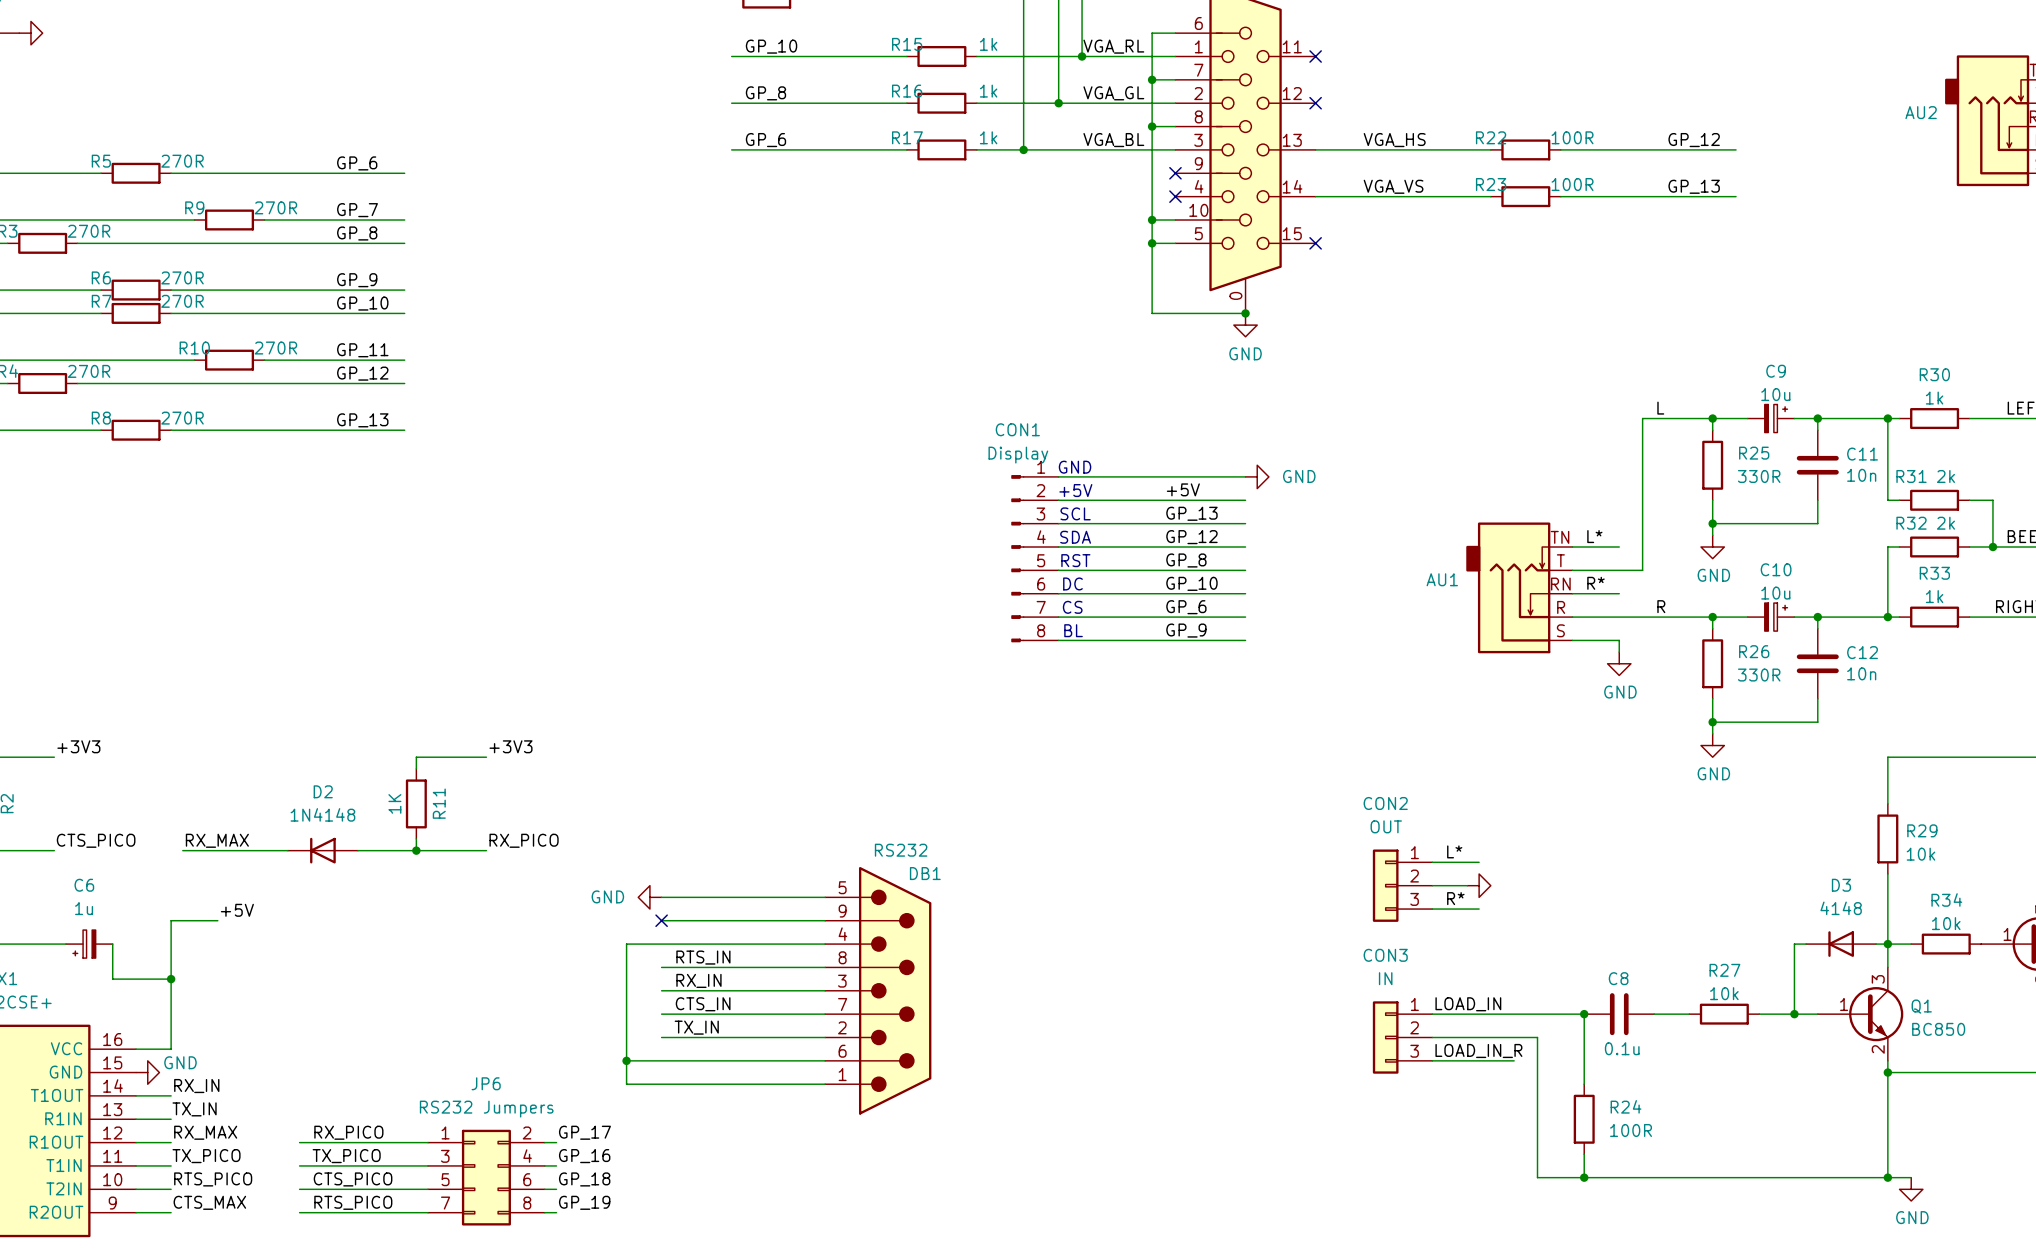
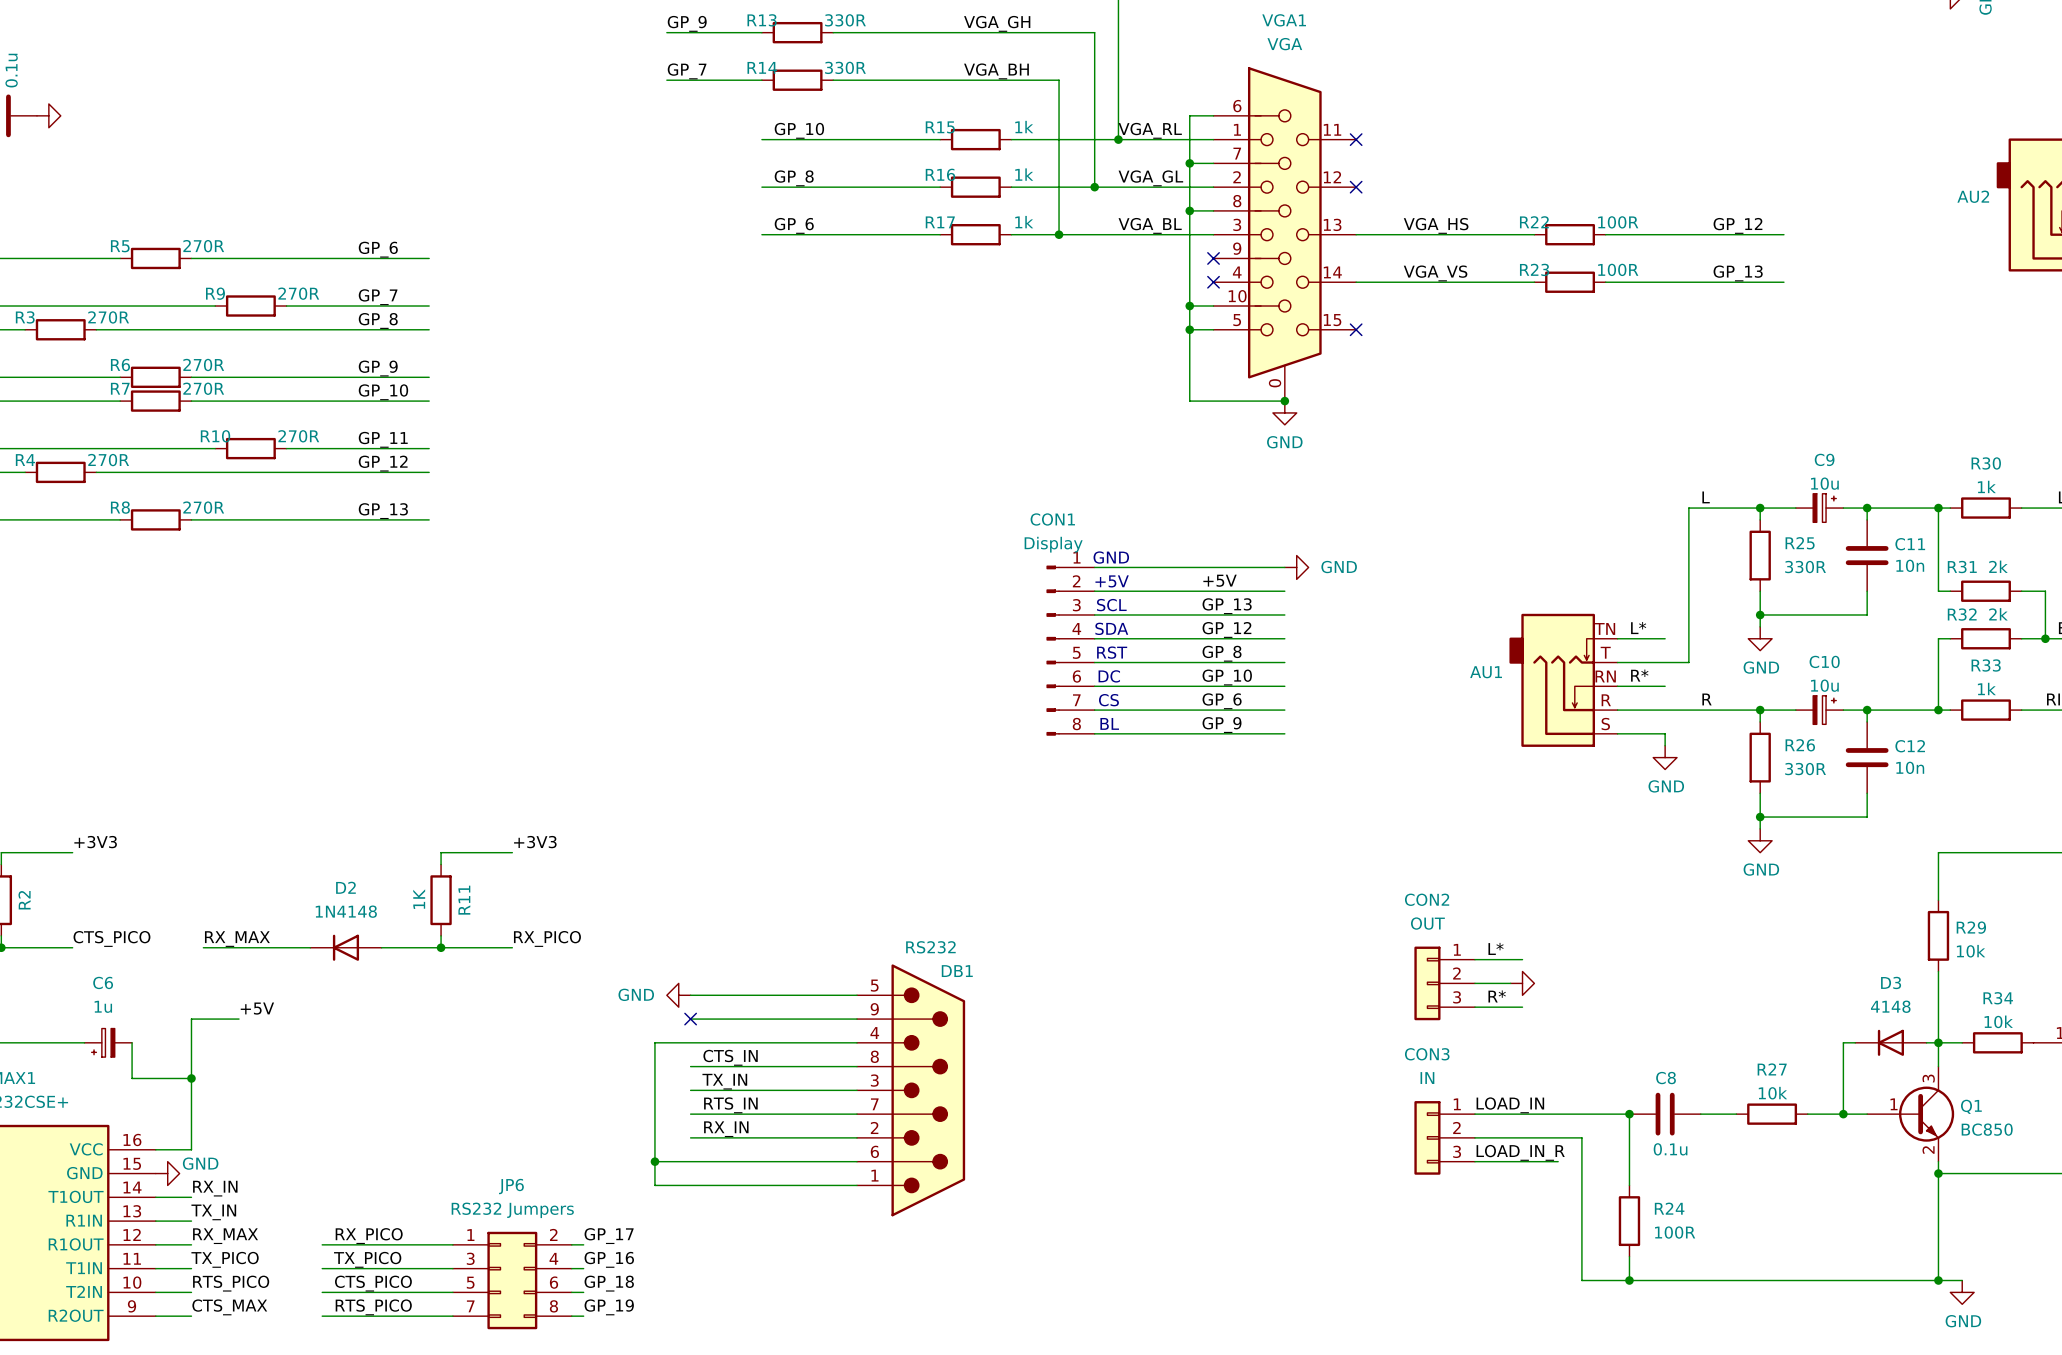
label: RTS_IN (703, 957) -> CTS_IN (730, 1057)
label: RX_IN (698, 980) -> TX_IN (724, 1081)
label: CTS_IN (703, 1004) -> RTS_IN (730, 1105)
label: TX_IN (696, 1027) -> RX_IN (726, 1129)

